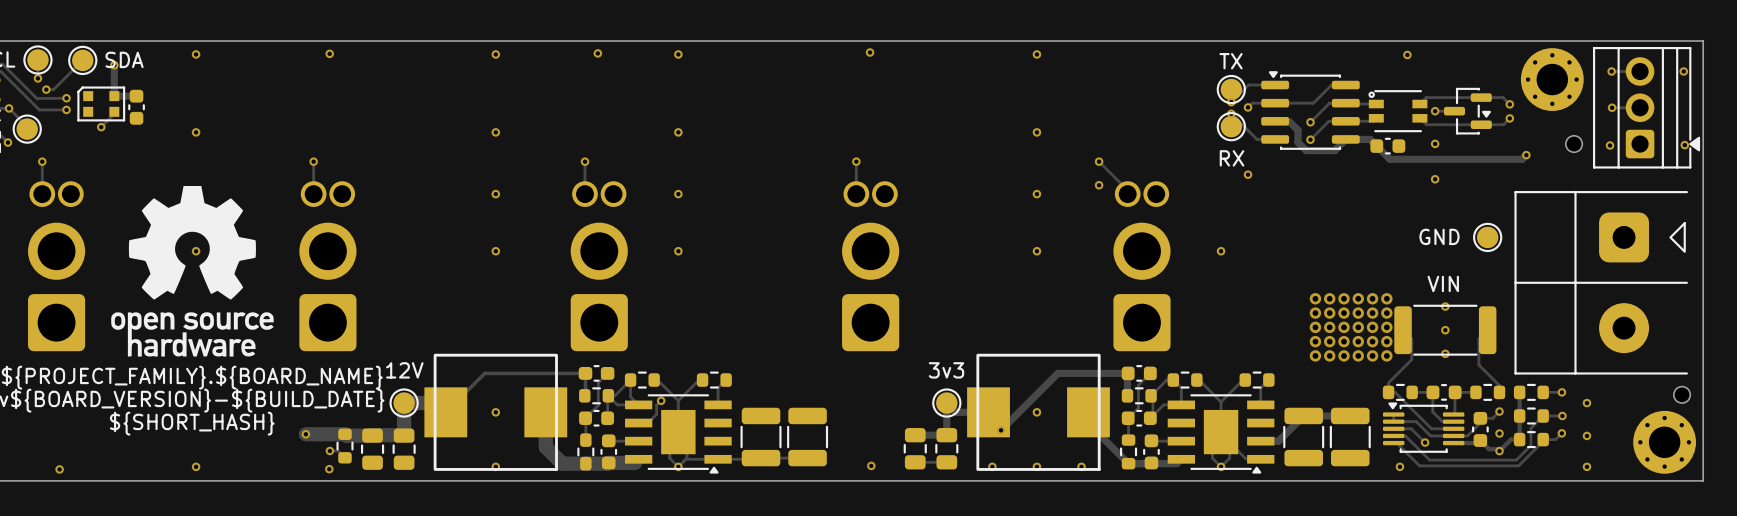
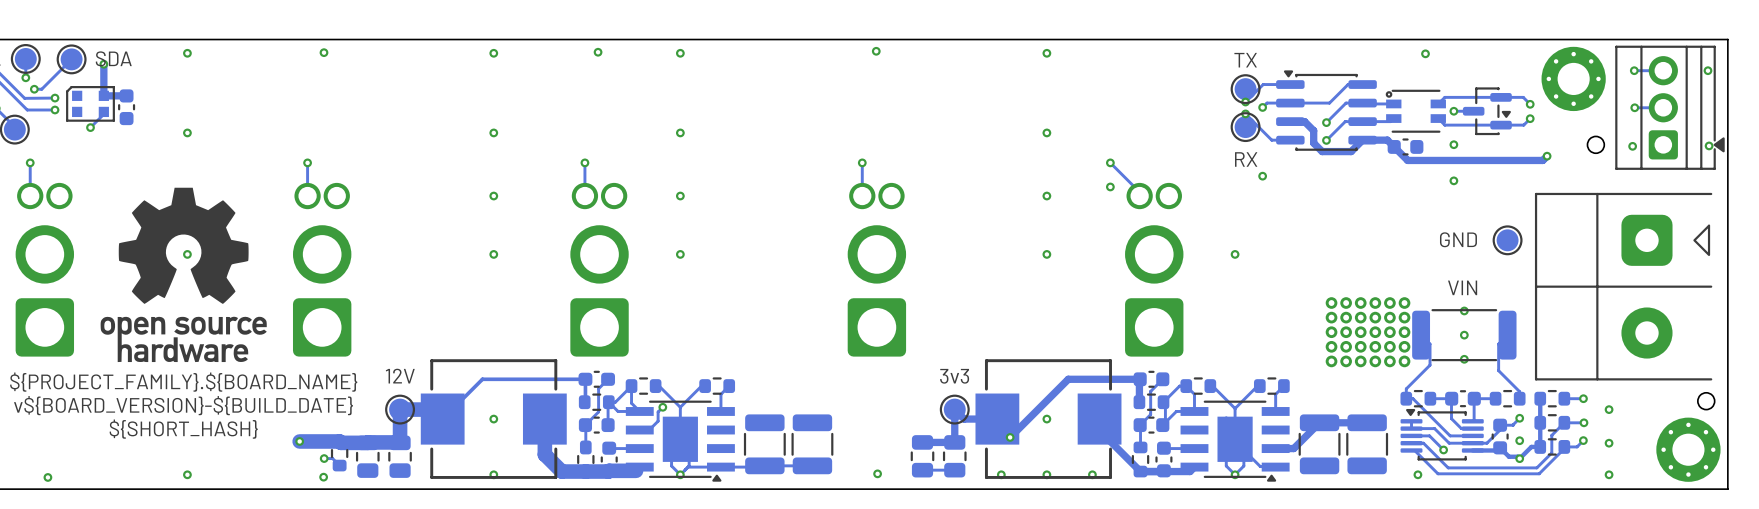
part footprint: [424, 353, 568, 471] -> [420, 359, 567, 479]
part footprint: [967, 353, 1110, 471] -> [975, 359, 1122, 479]

